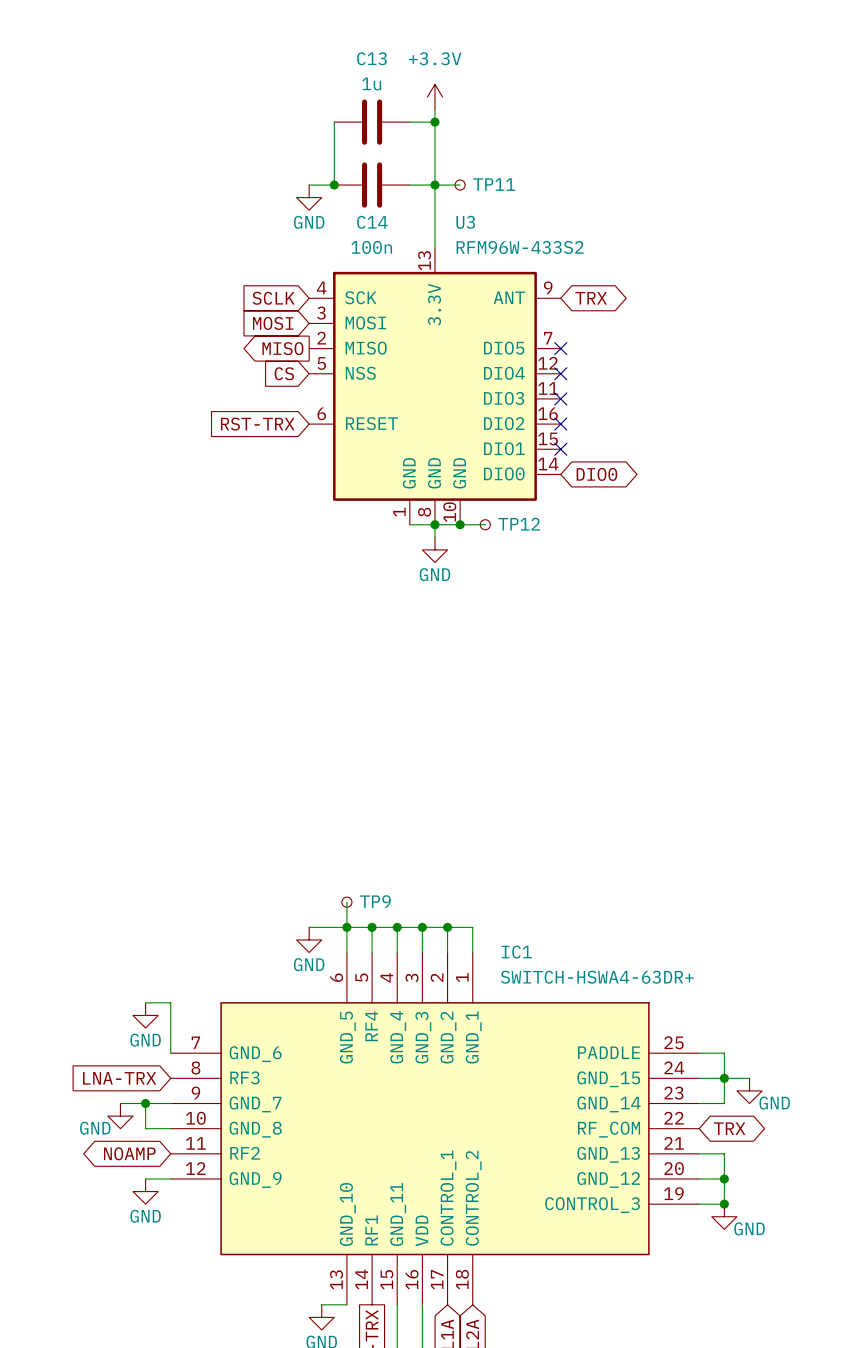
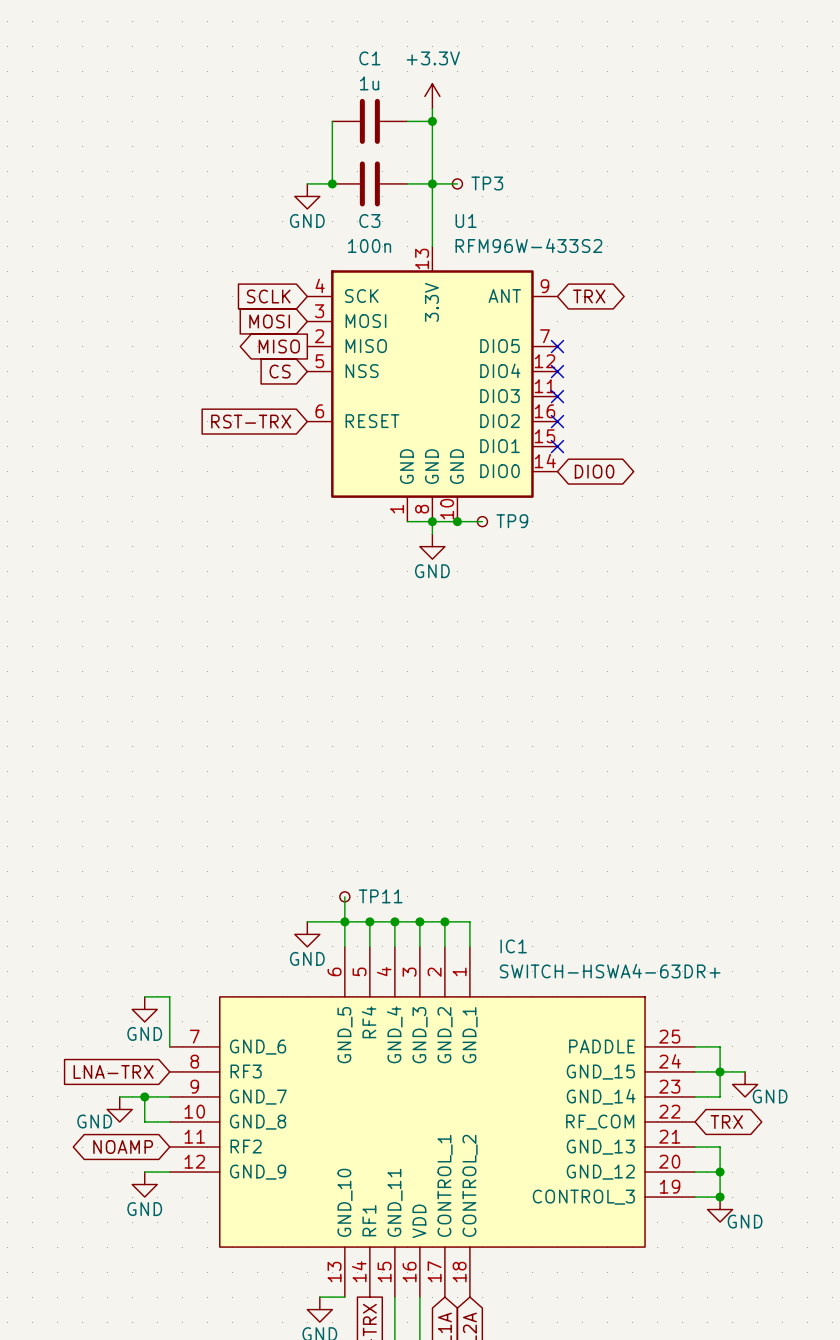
C13 name: C13 (371, 58) -> C1 (369, 58)
TP11 name: TP11 (494, 184) -> TP3 (487, 183)
C14 name: C14 (372, 222) -> C3 (369, 221)
U3 name: U3 (465, 222) -> U1 (466, 221)
TP12 name: TP12 (519, 524) -> TP9 (512, 521)
TP9 name: TP9 (375, 901) -> TP11 (380, 896)

